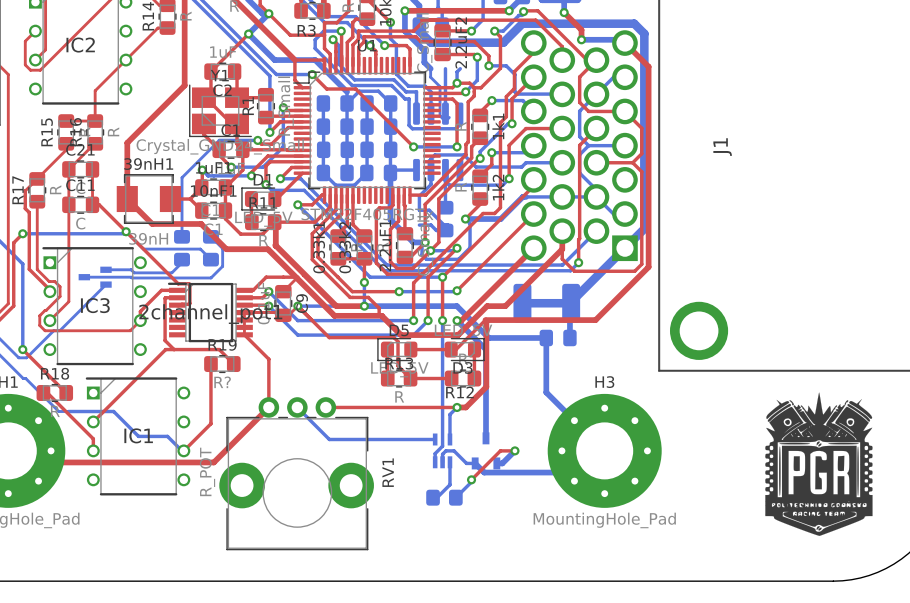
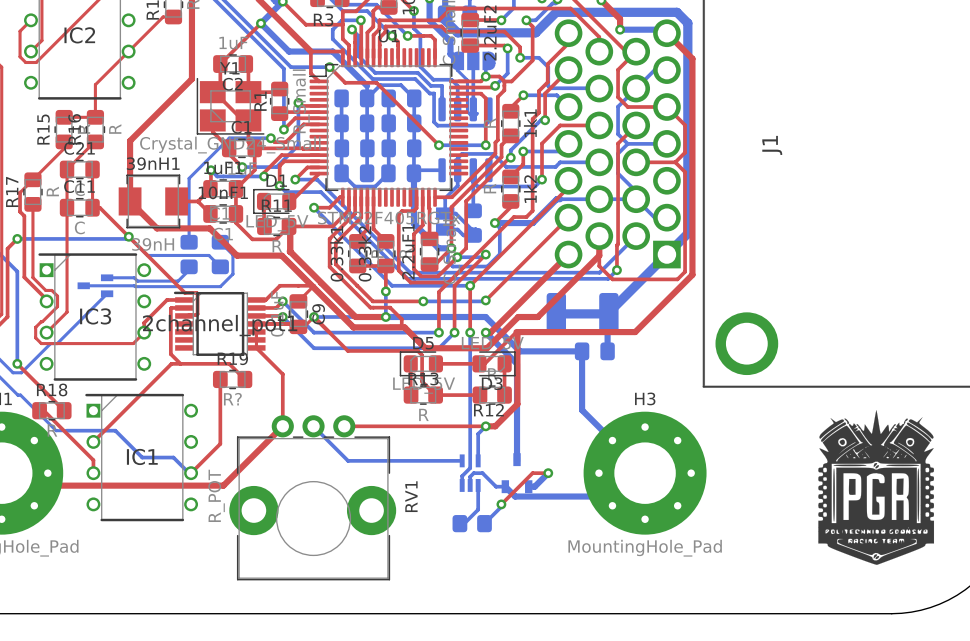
part: none -> (473, 60)
part: none -> (445, 221)

